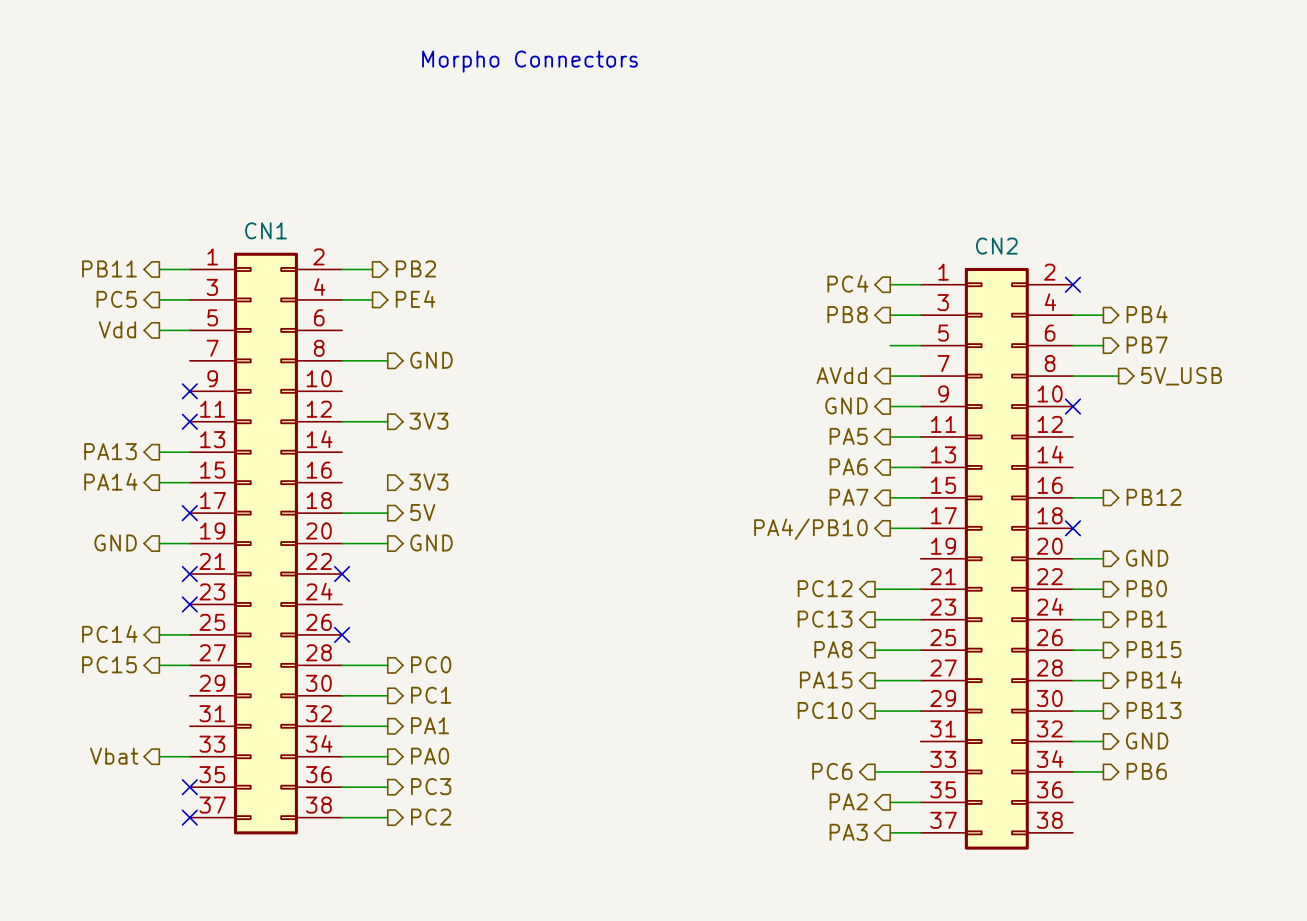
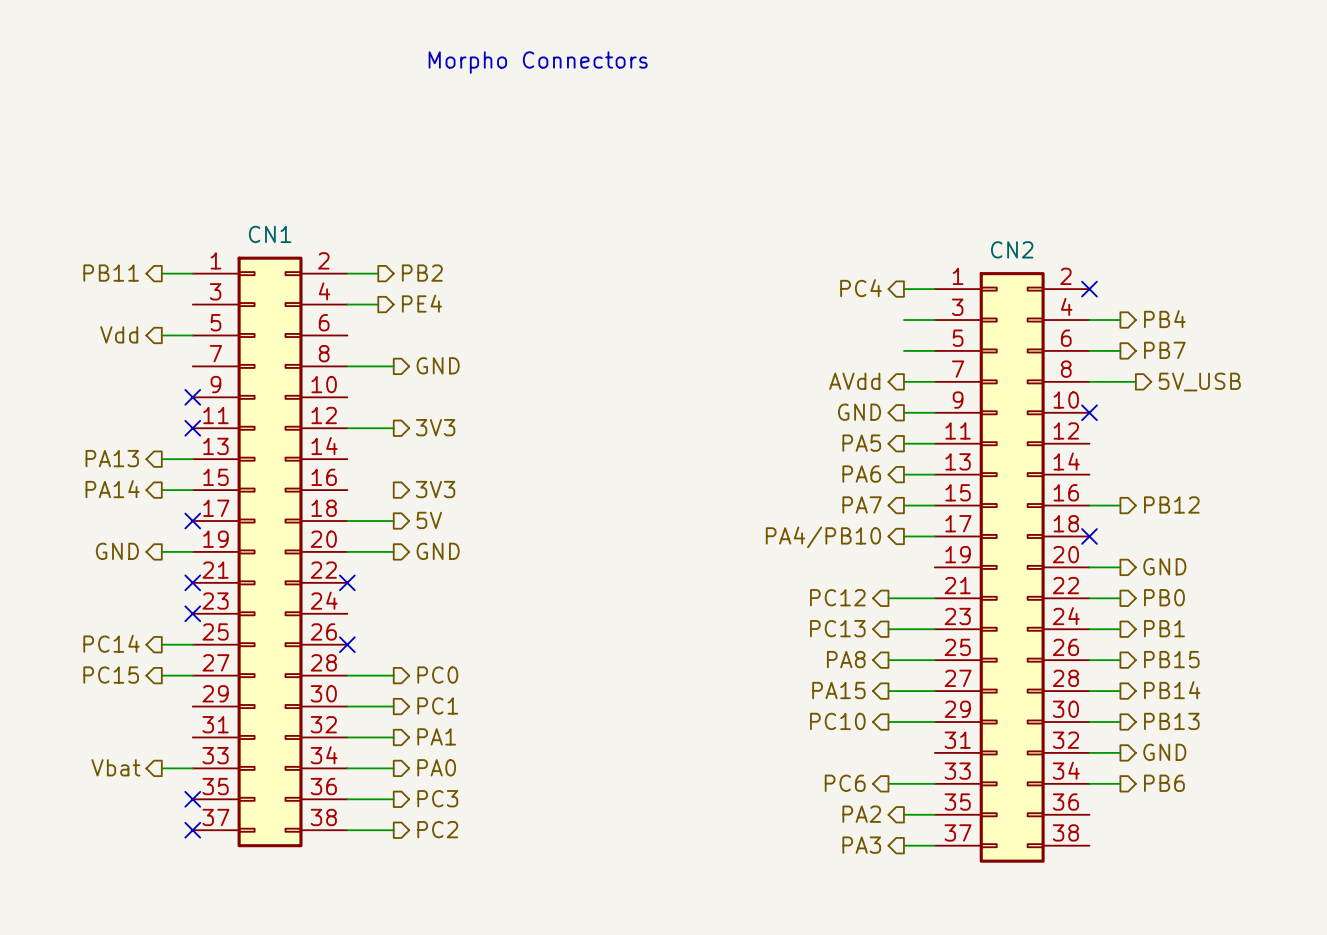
hierarchical label: PC5 (116, 299) -> none
wire: (159, 299) (189, 299) -> none
hierarchical label: PB8 (847, 314) -> none

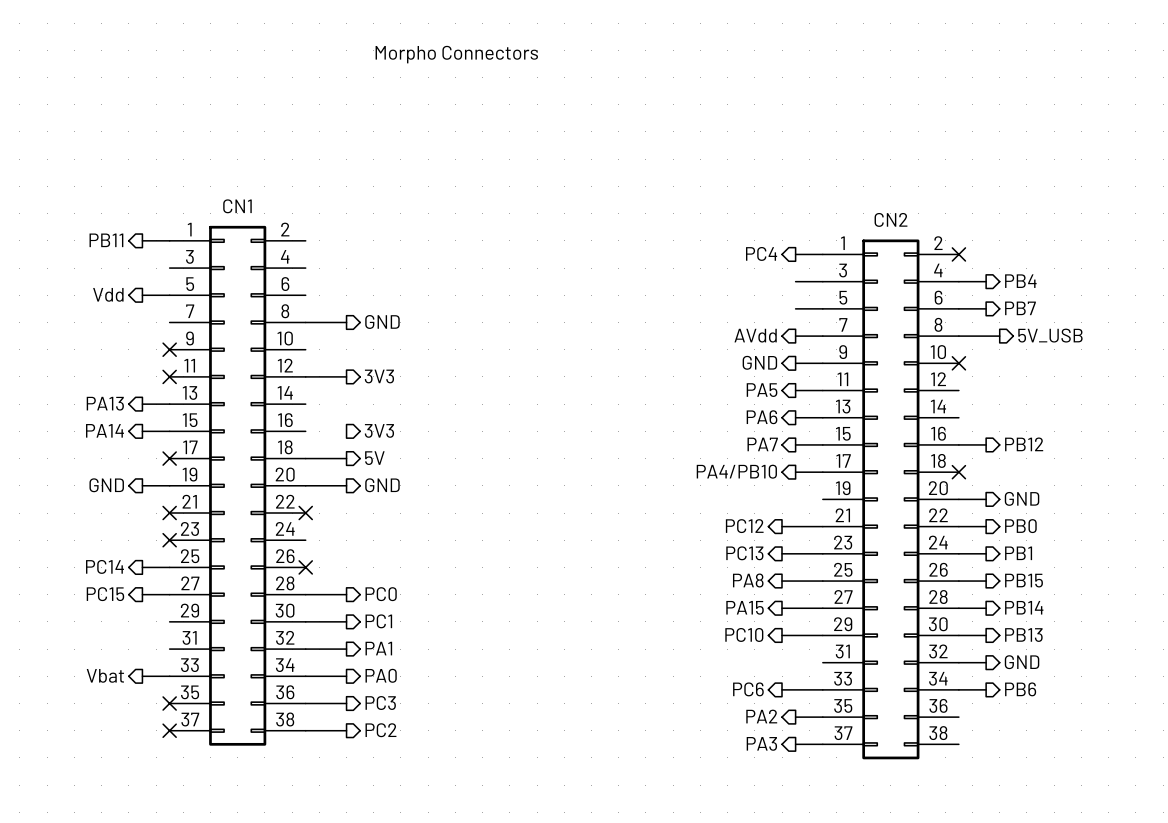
wire: (347, 273) (378, 273) -> none
hierarchical label: PB2 (422, 273) -> none
hierarchical label: PE4 (421, 303) -> none
wire: (347, 304) (378, 304) -> none

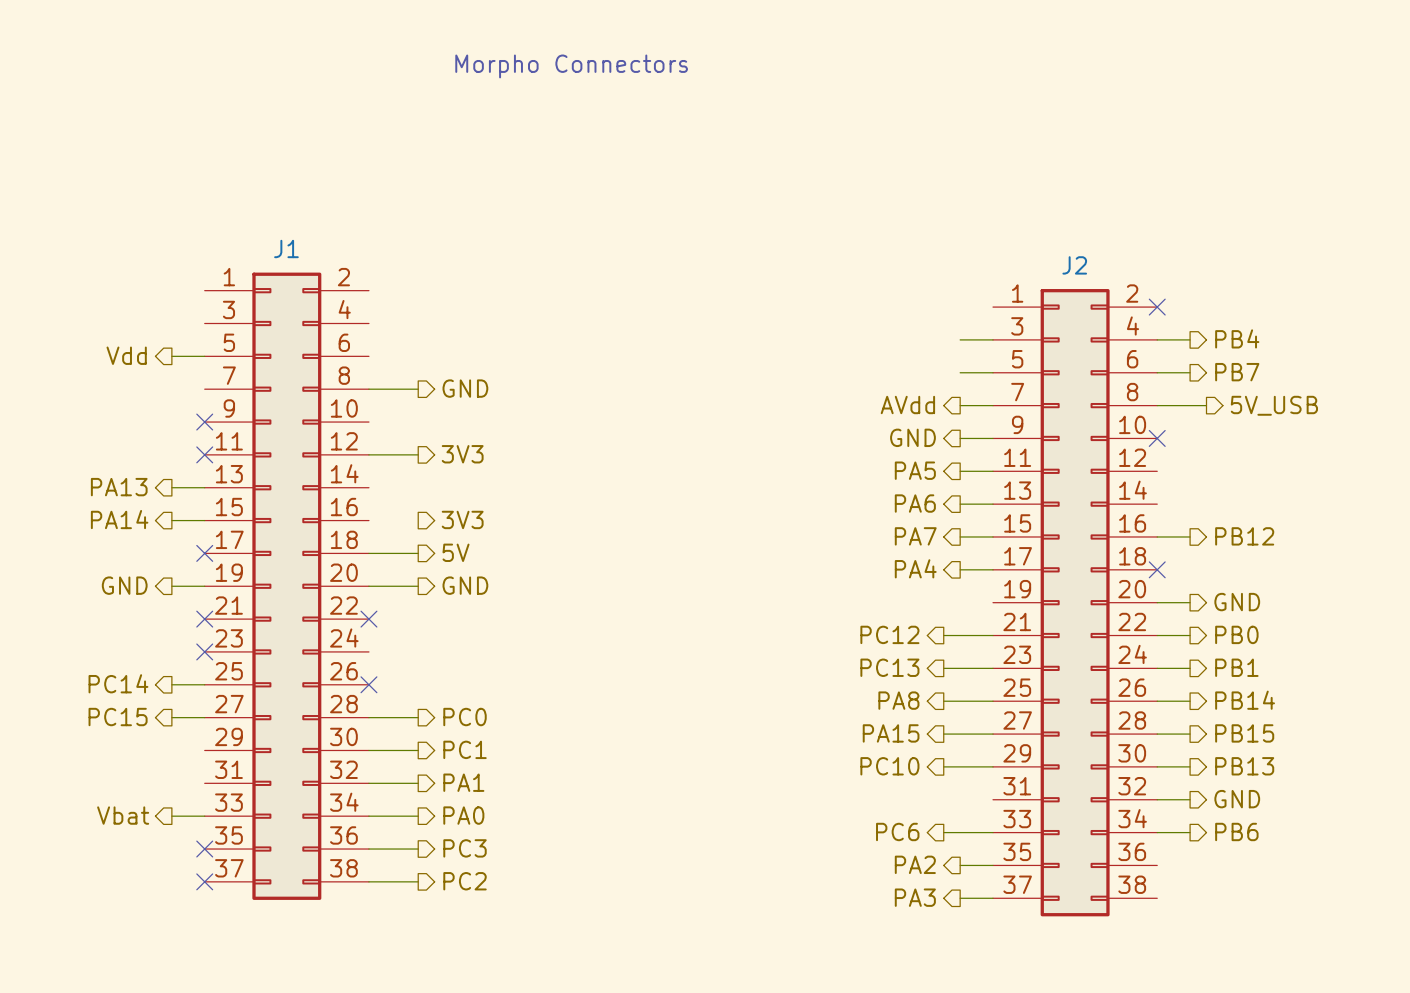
CN1 name: CN1 (237, 206) -> J1 (286, 248)
CN2 name: CN2 (891, 219) -> J2 (1074, 265)
hierarchical label: PB11 (106, 240) -> none
wire: (142, 240) (169, 240) -> none
hierarchical label: PC4 (761, 253) -> none
wire: (795, 254) (822, 254) -> none
hierarchical label: PA4/PB10 (736, 471) -> PA4 (915, 568)
hierarchical label: PB15 (1024, 580) -> PB14 (1245, 700)
hierarchical label: PB14 (1024, 607) -> PB15 (1244, 733)

